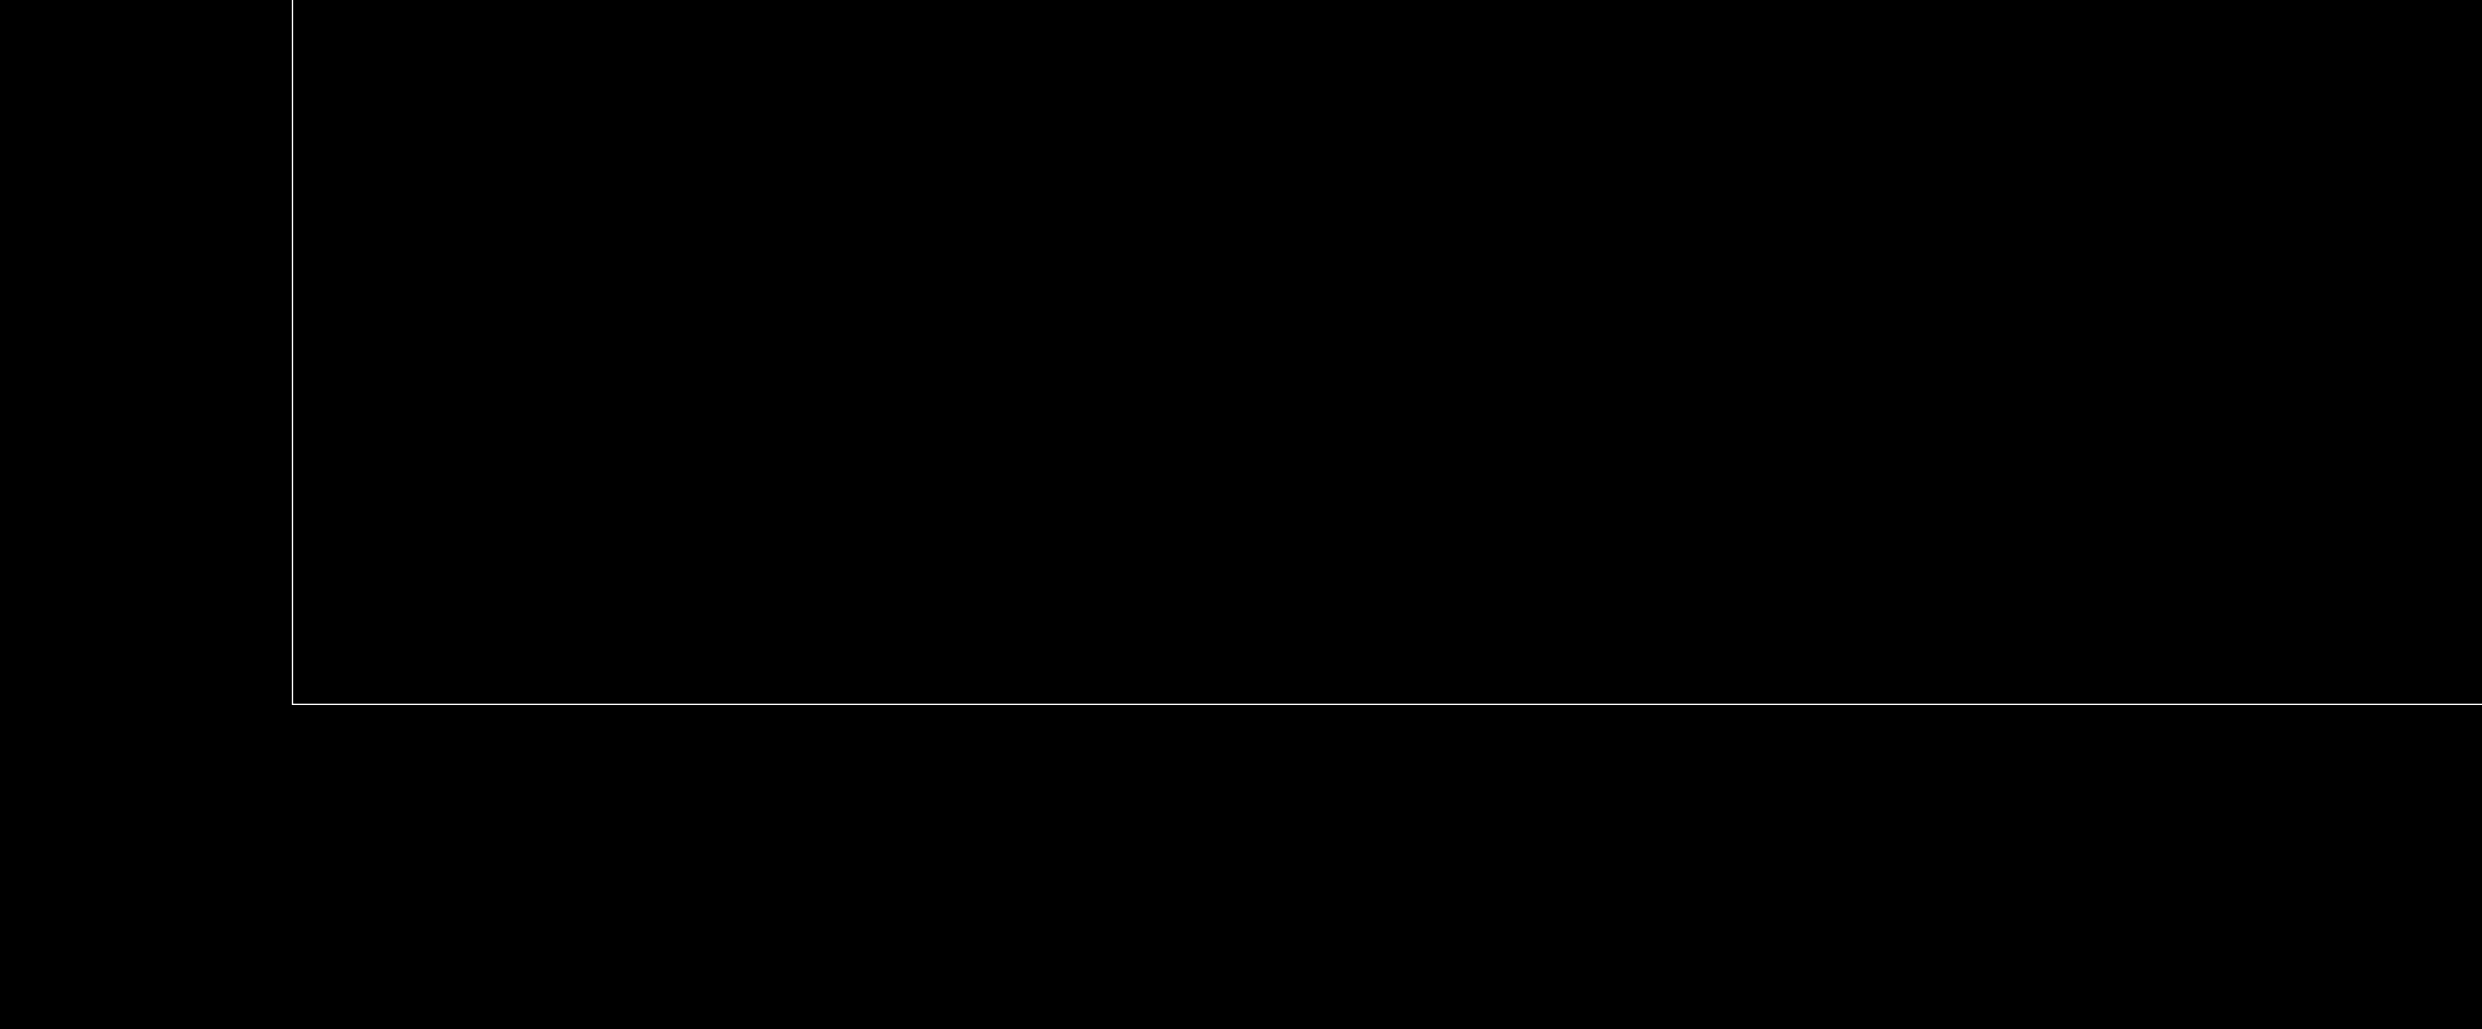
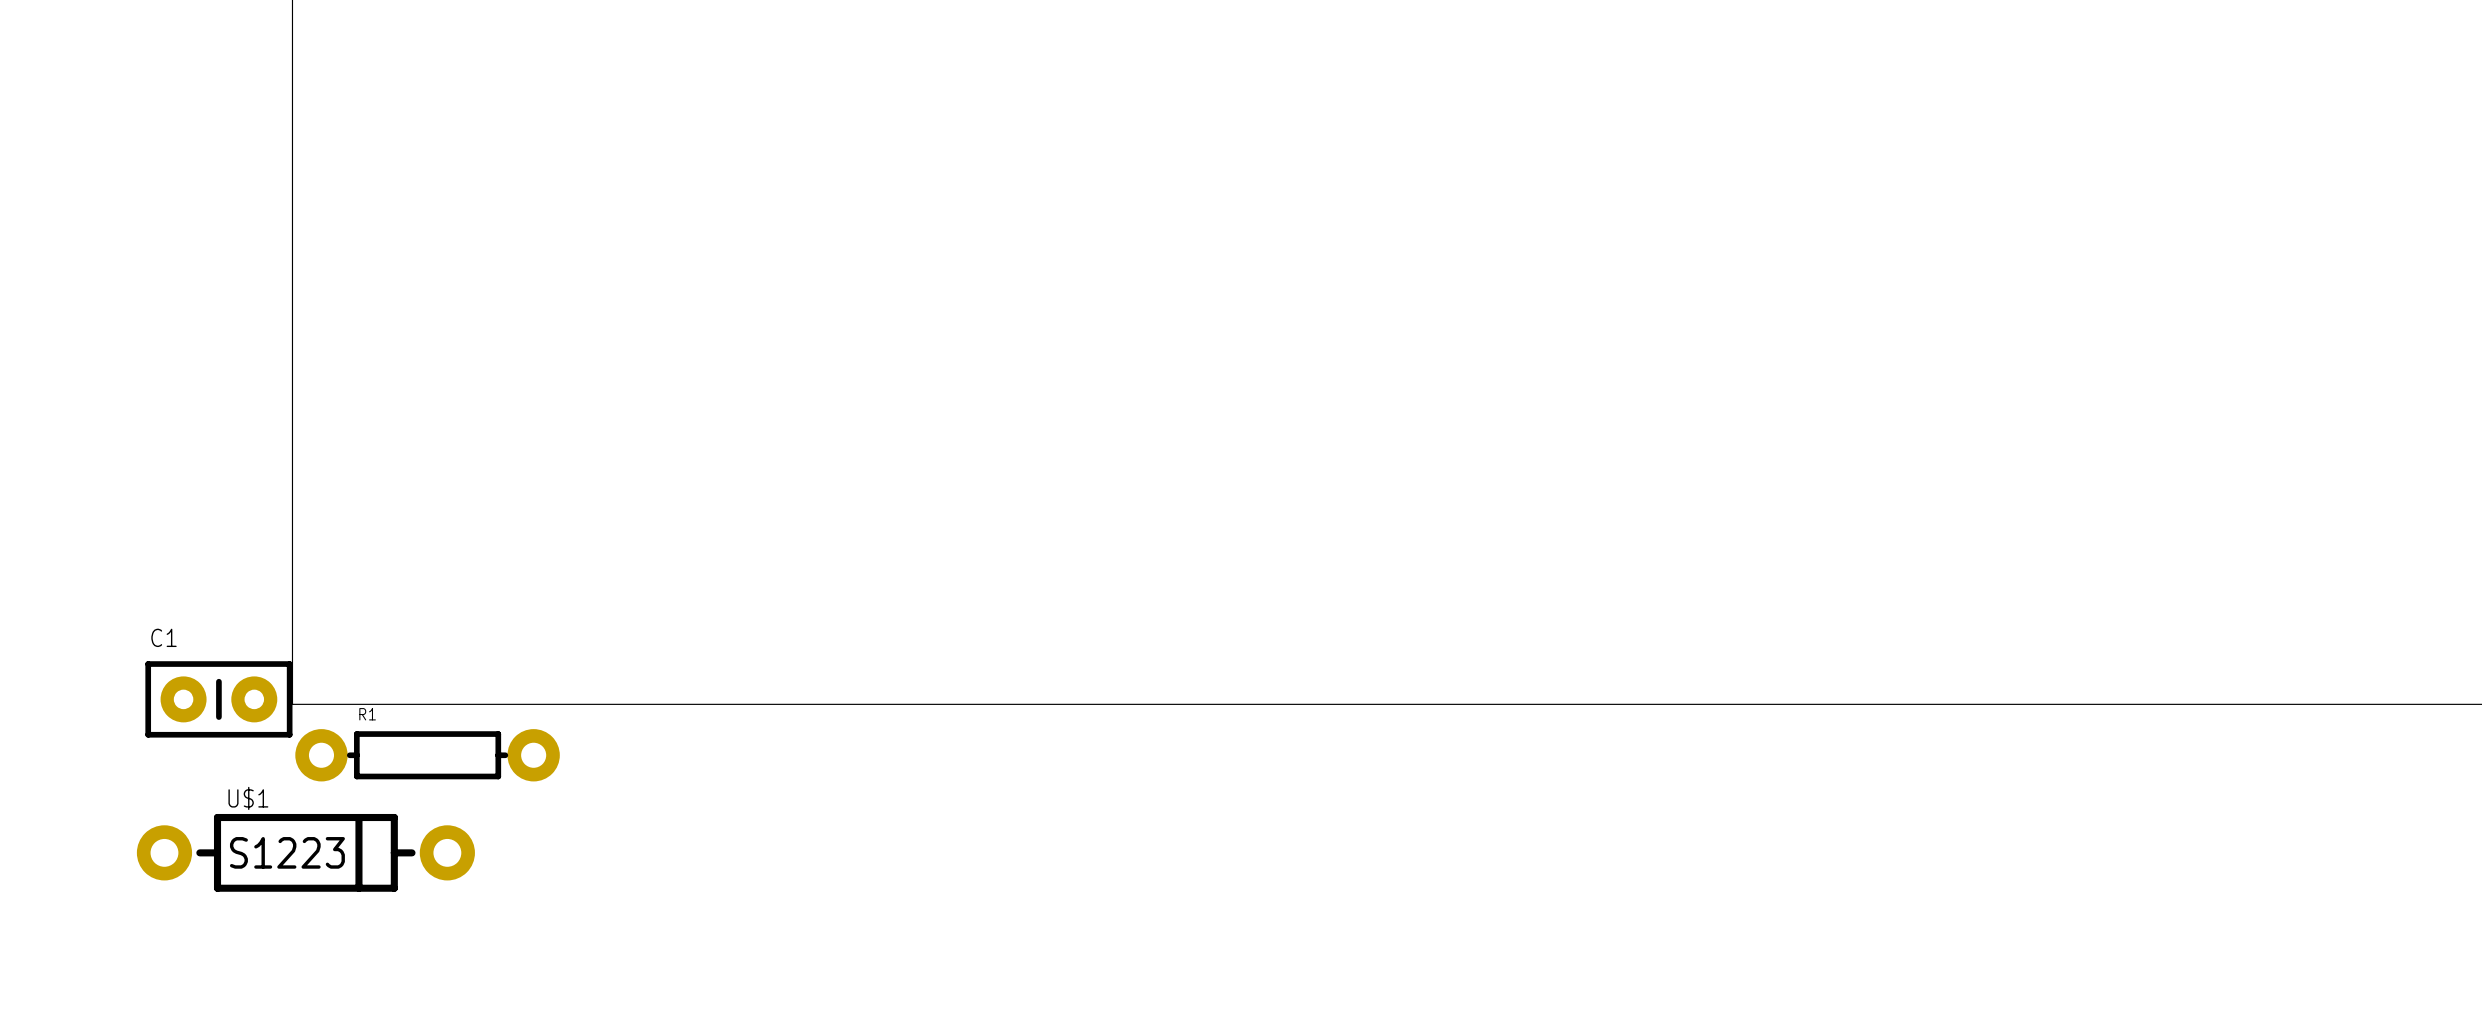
C1: none -> (218, 699)
R1: none -> (427, 755)
U$1: none -> S1223 (305, 852)

